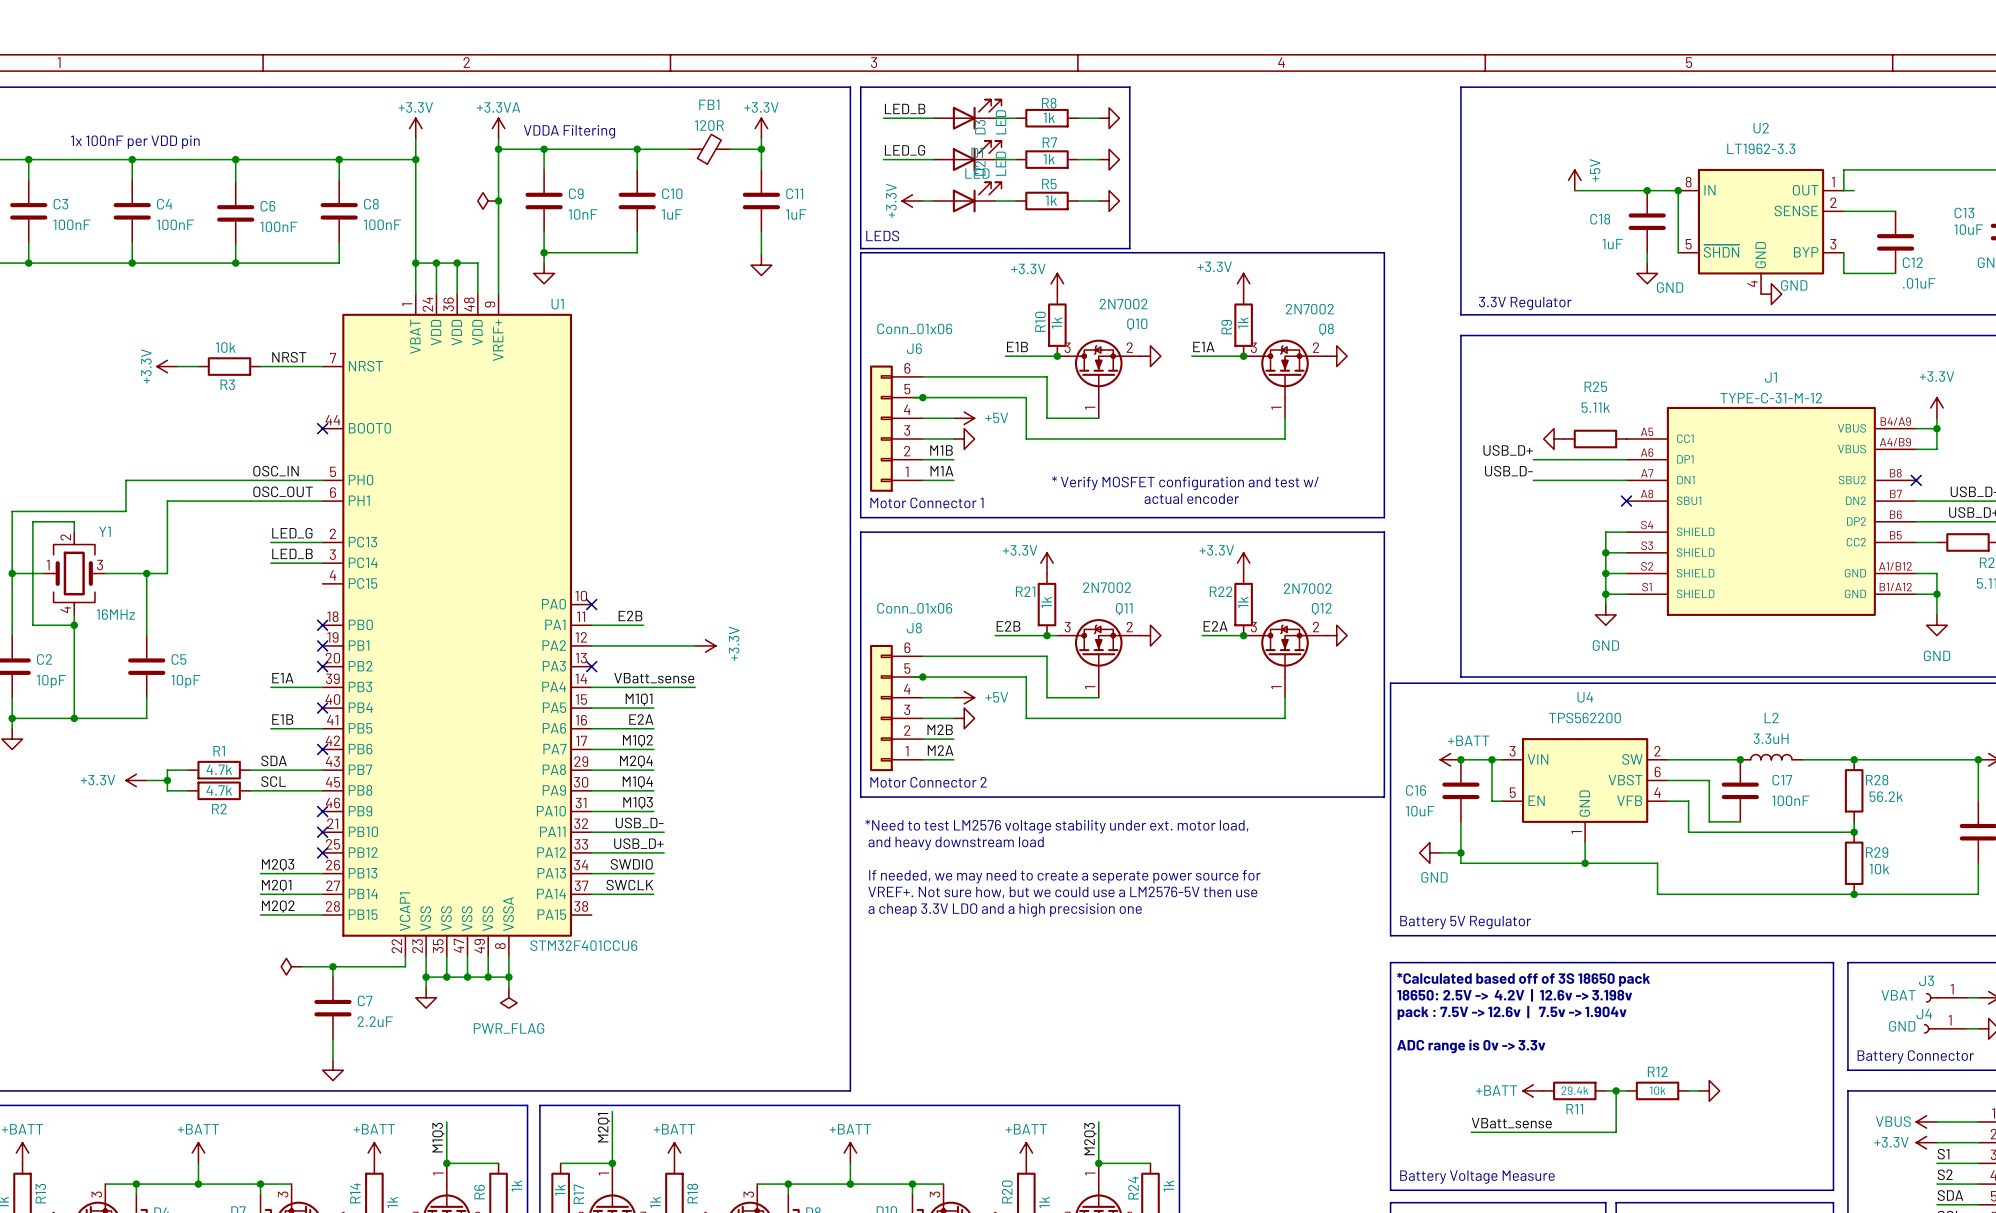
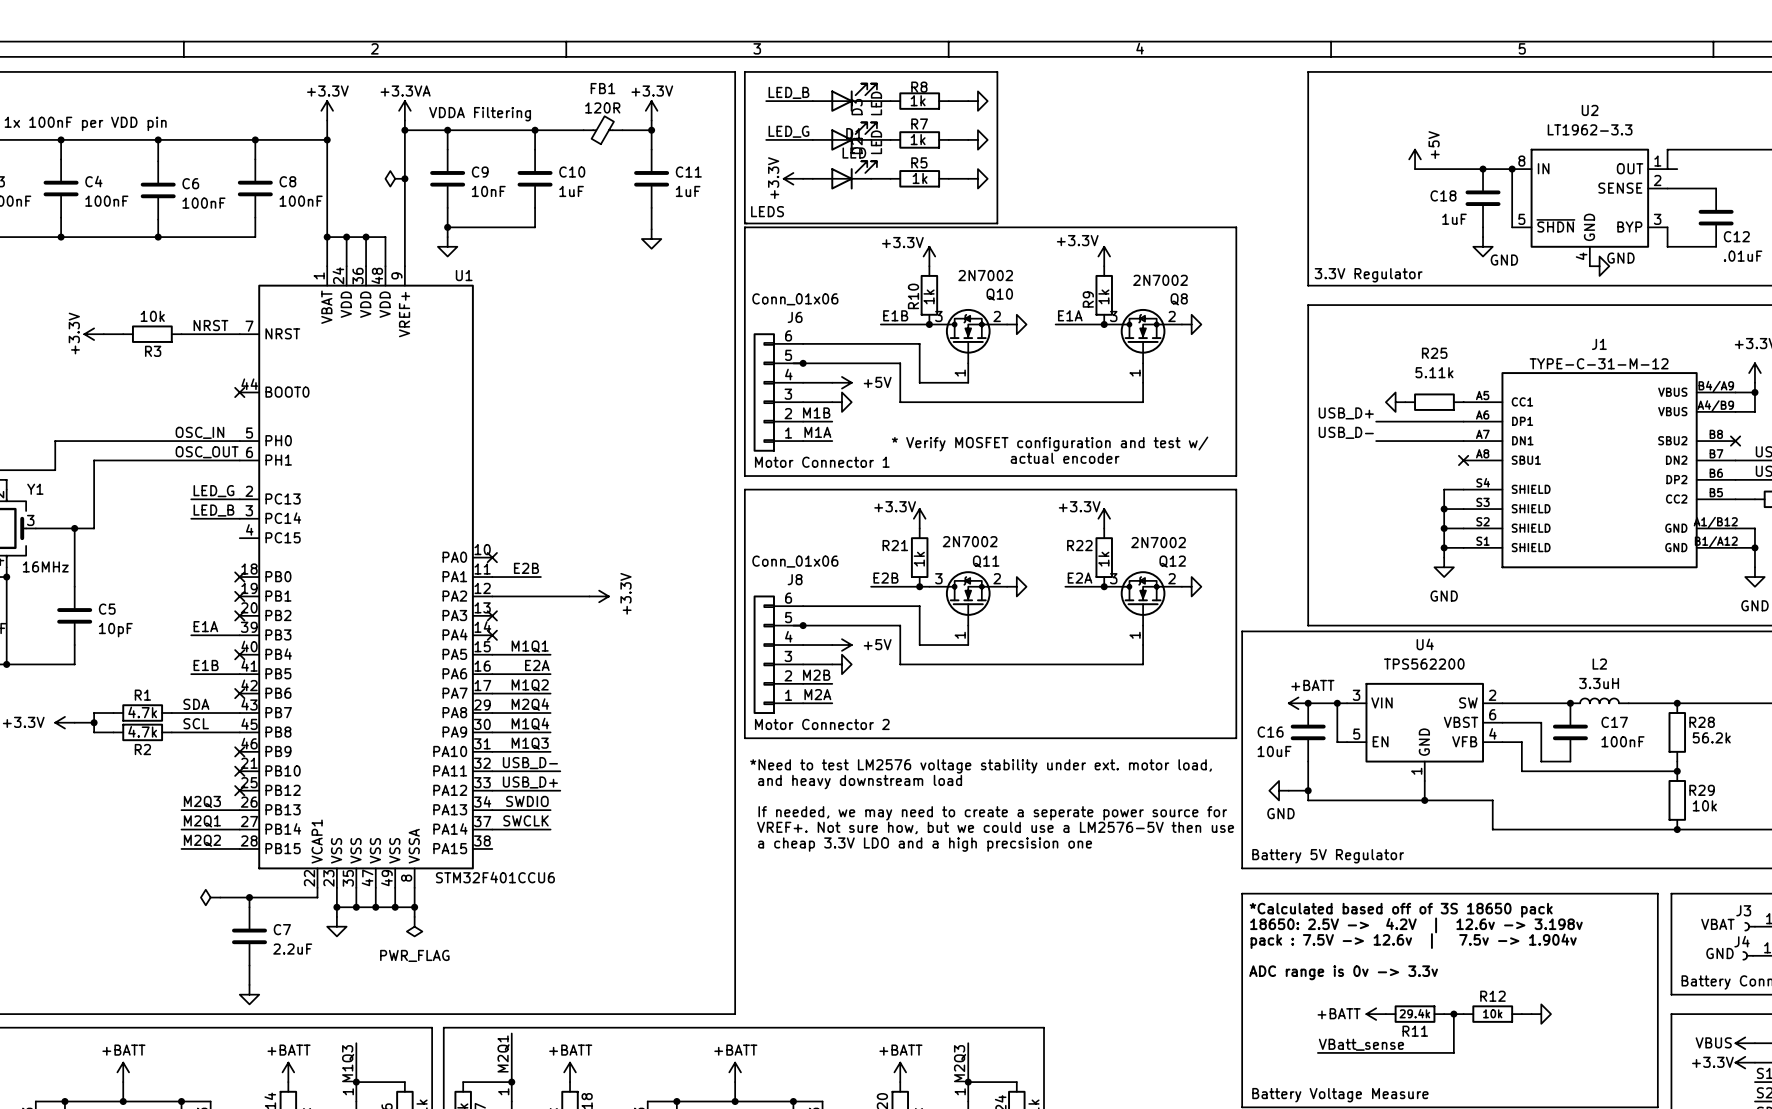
label: VBatt_sense (654, 678) -> none
wire: (591, 687) (695, 687) -> none
no-connect mark: none -> (492, 635)

